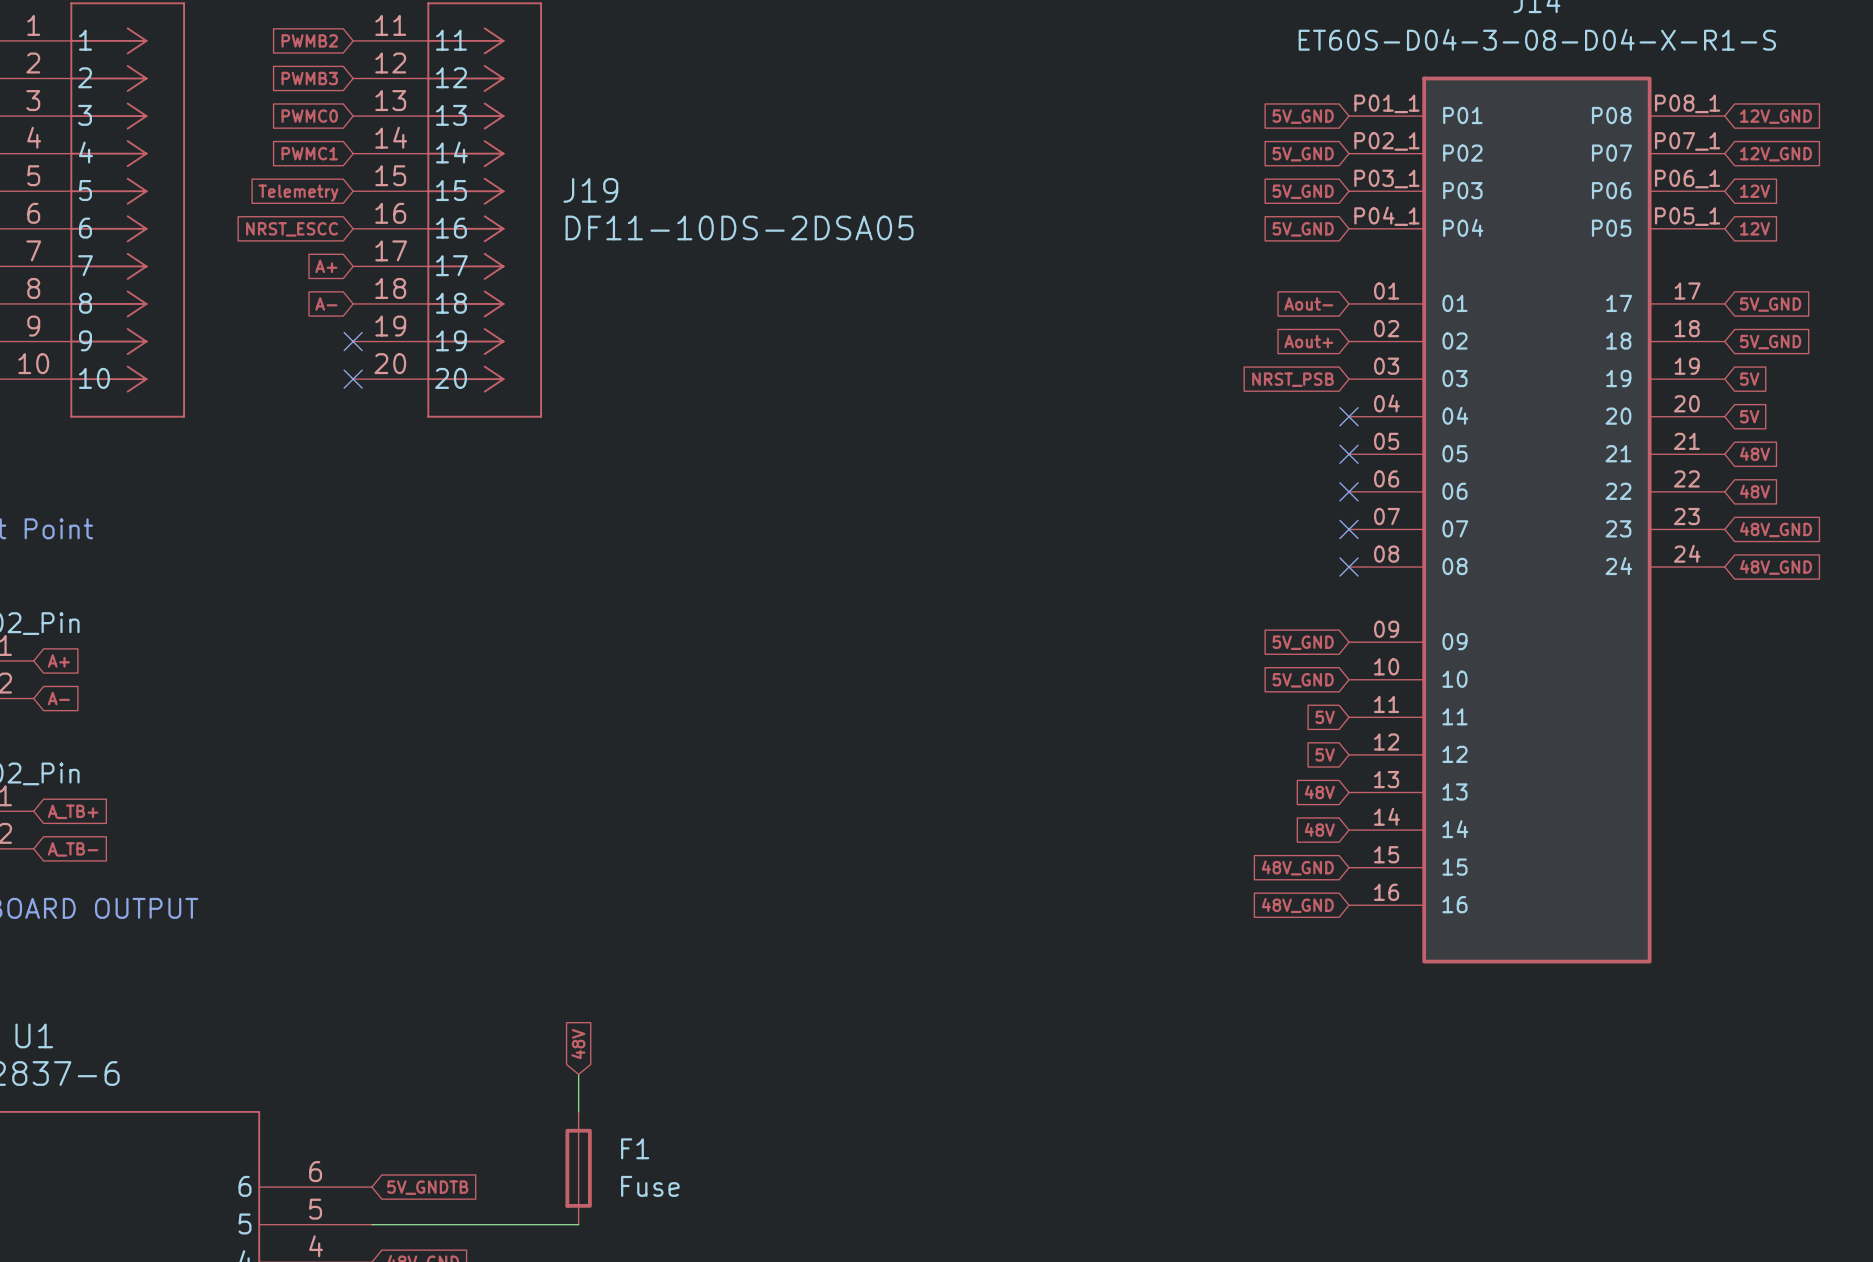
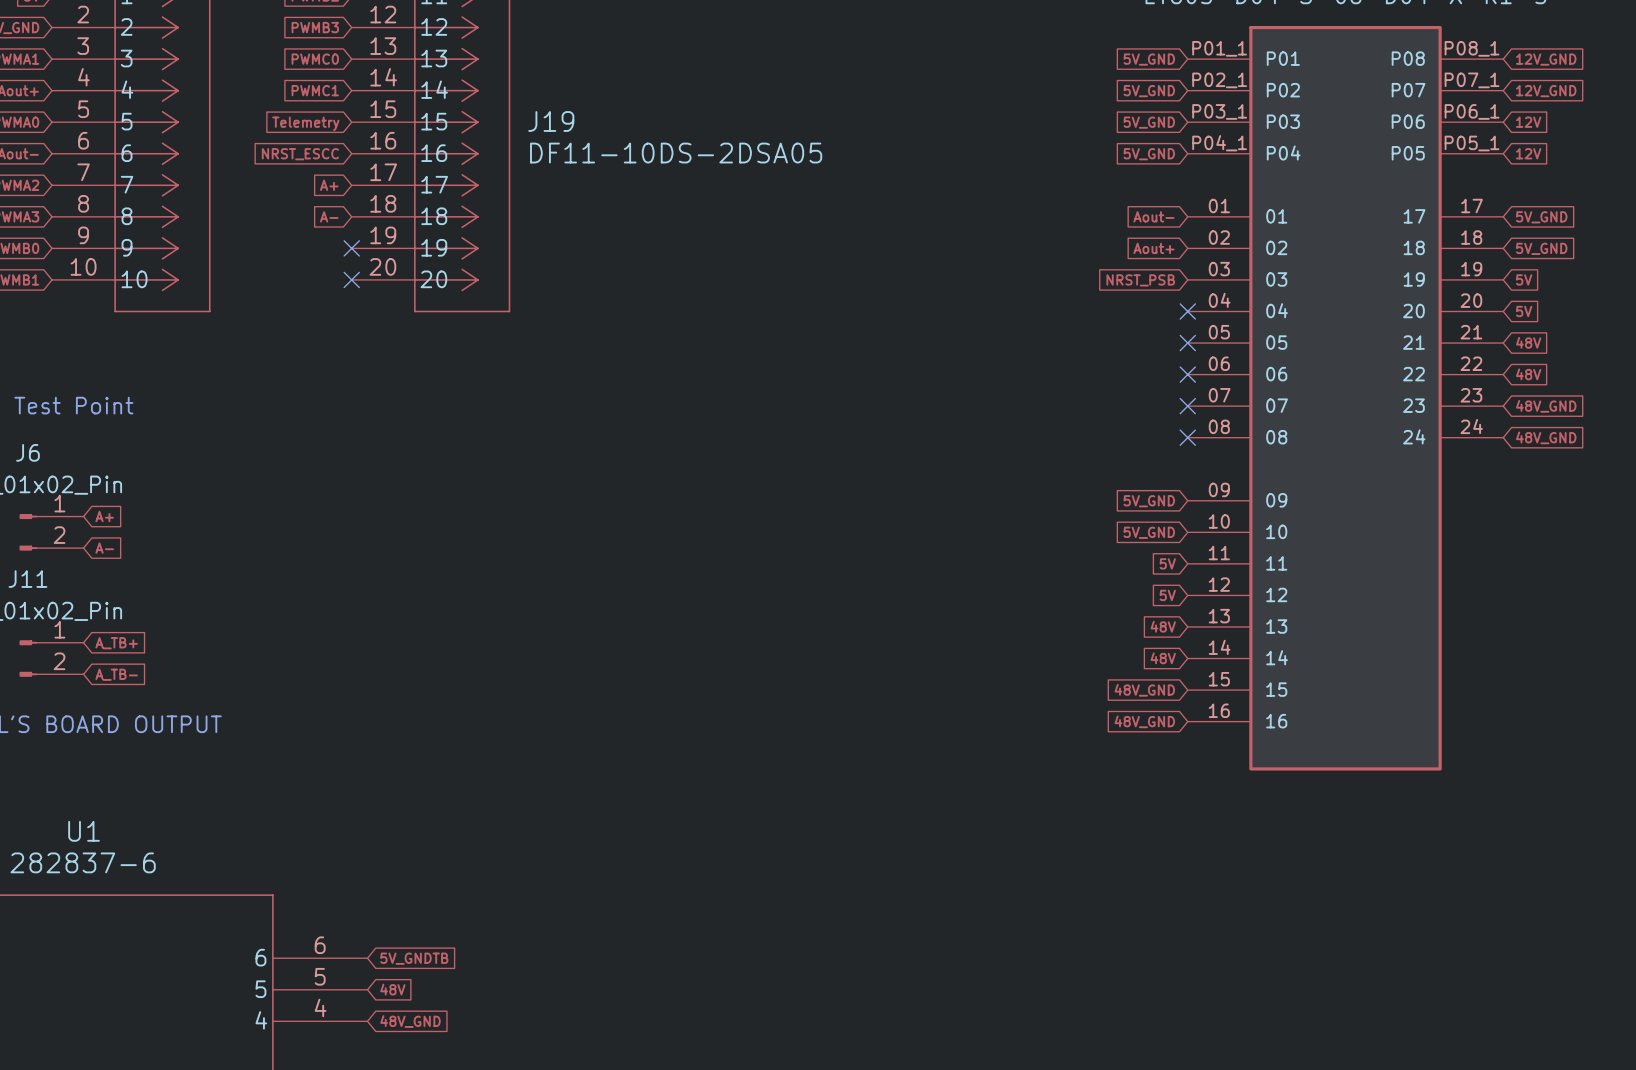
global label rotation: 0° (578, 1044) -> 90° clockwise (392, 989)
global label position: 48V (578, 1044) -> 48V (392, 989)
wire: (578, 1074) (578, 1111) -> none
F1: Fuse (578, 1168) -> none
wire: (371, 1224) (578, 1224) -> none

